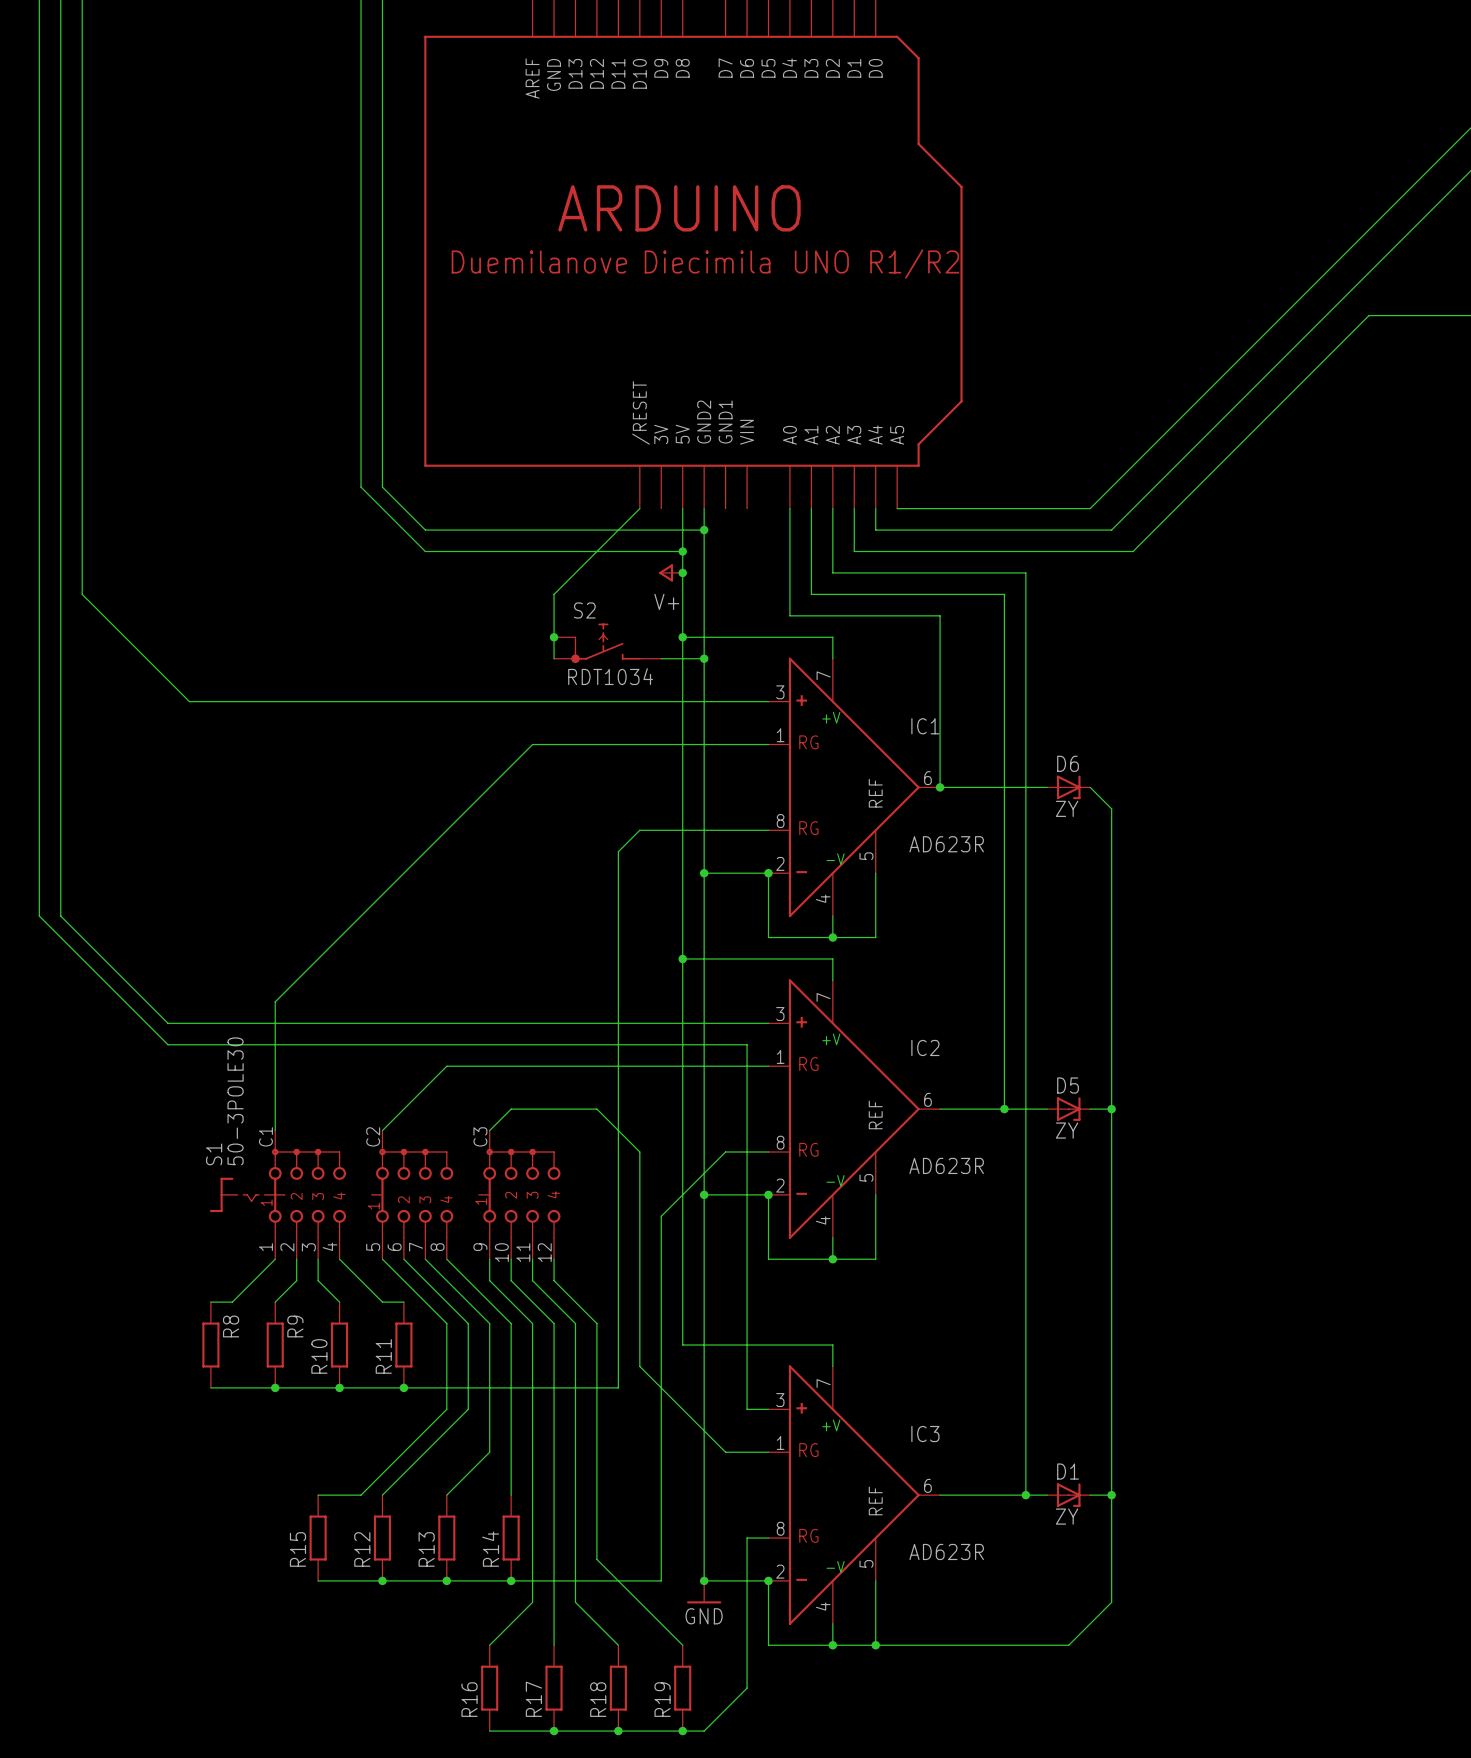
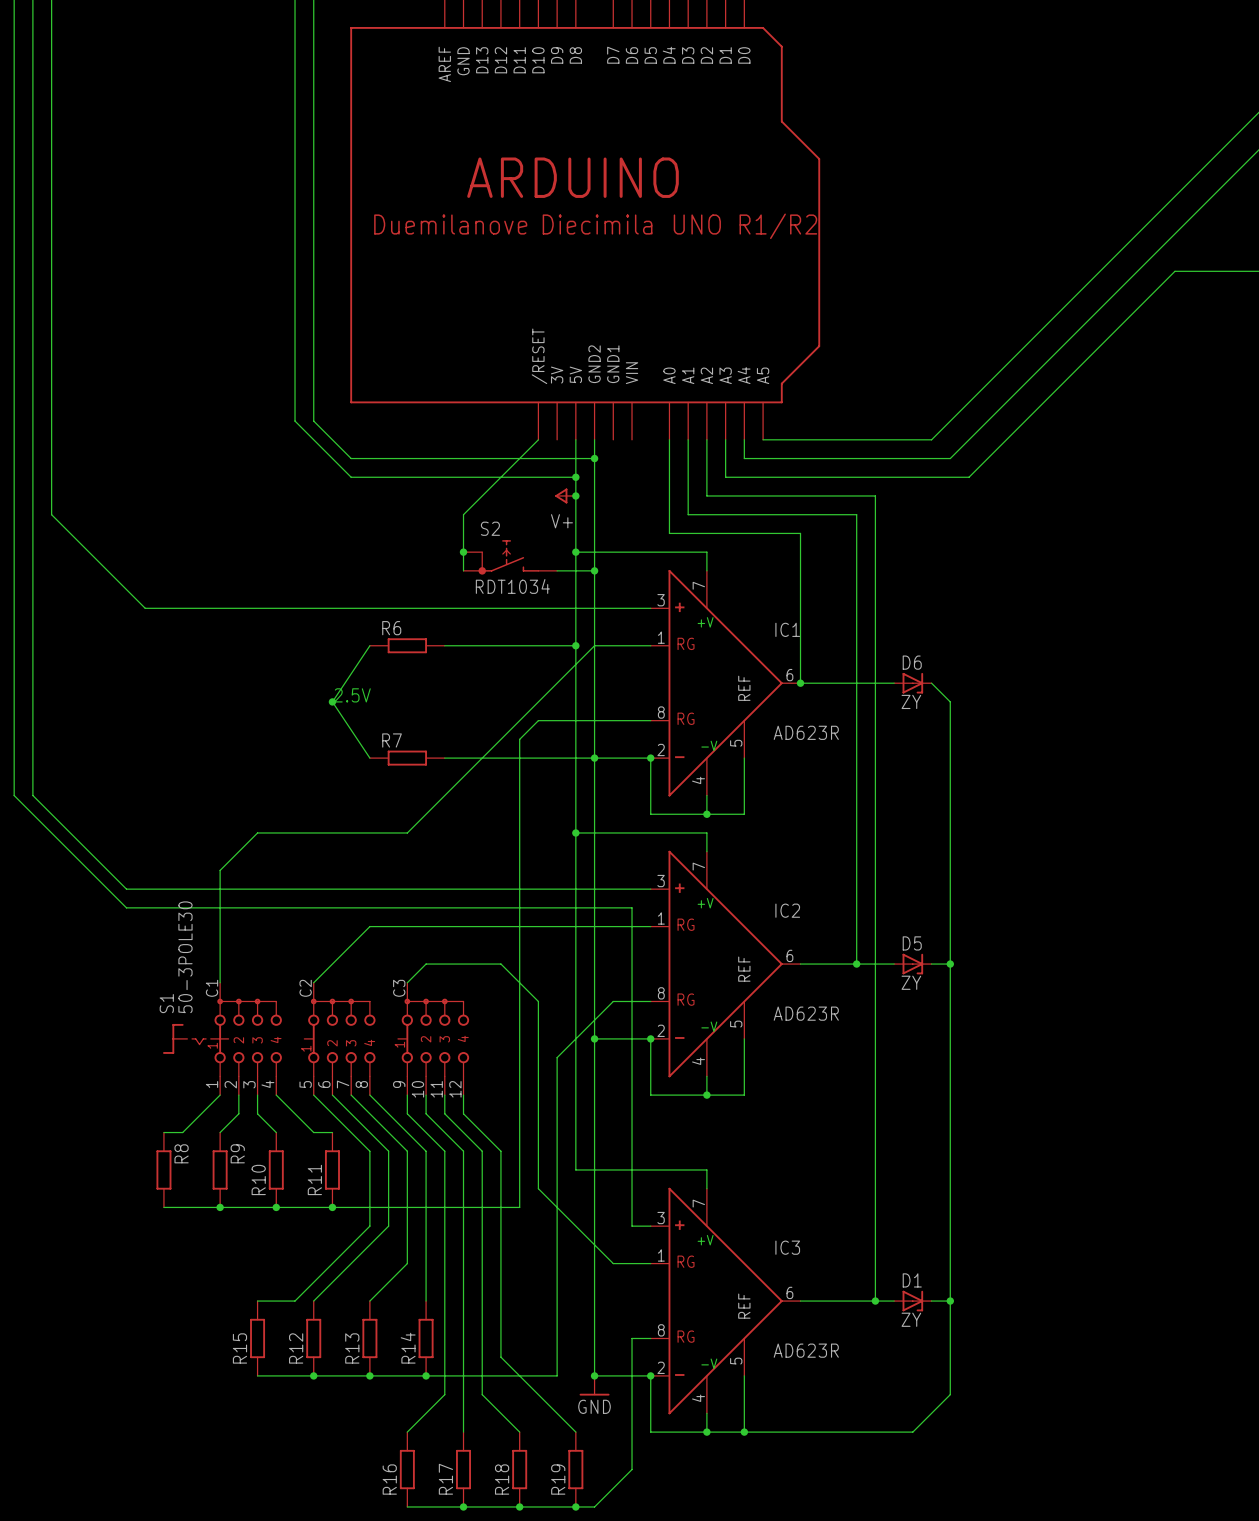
wire: none -> (369, 645) (332, 701) (369, 758)
R6: none -> (407, 645)
wire: (532, 744) (318, 958) -> (594, 645) (407, 832) (257, 832)
wire: (682, 744) (704, 744) -> none
junction: none -> (575, 645)
text: none -> 2.5V (352, 695)
junction: none -> (332, 701)
R7: none -> (407, 758)
wire: none -> (444, 758) (594, 758)

